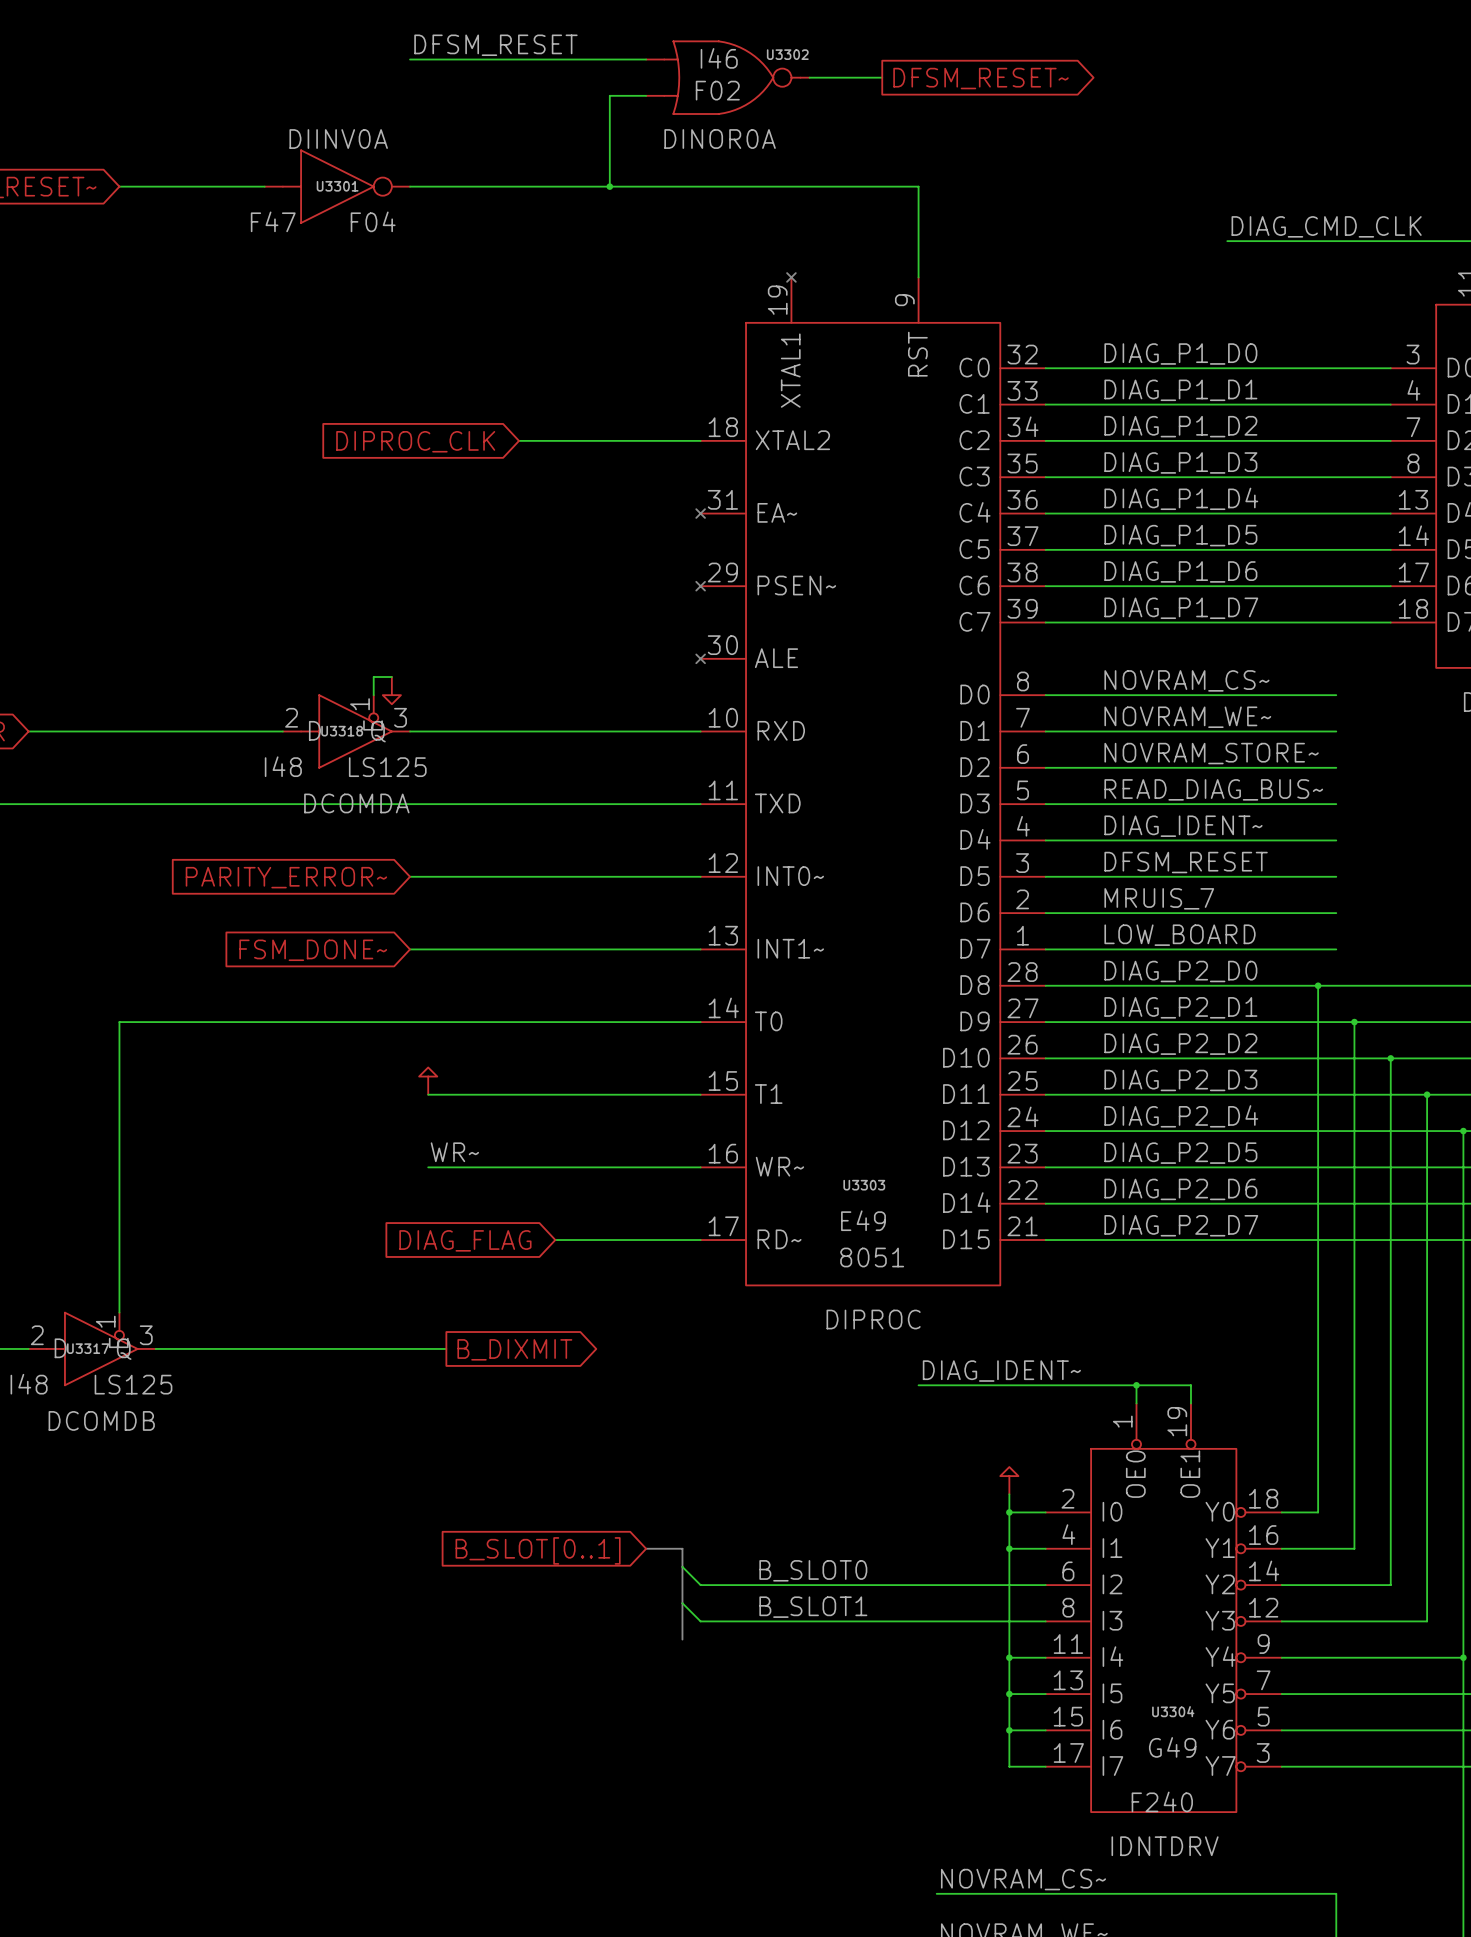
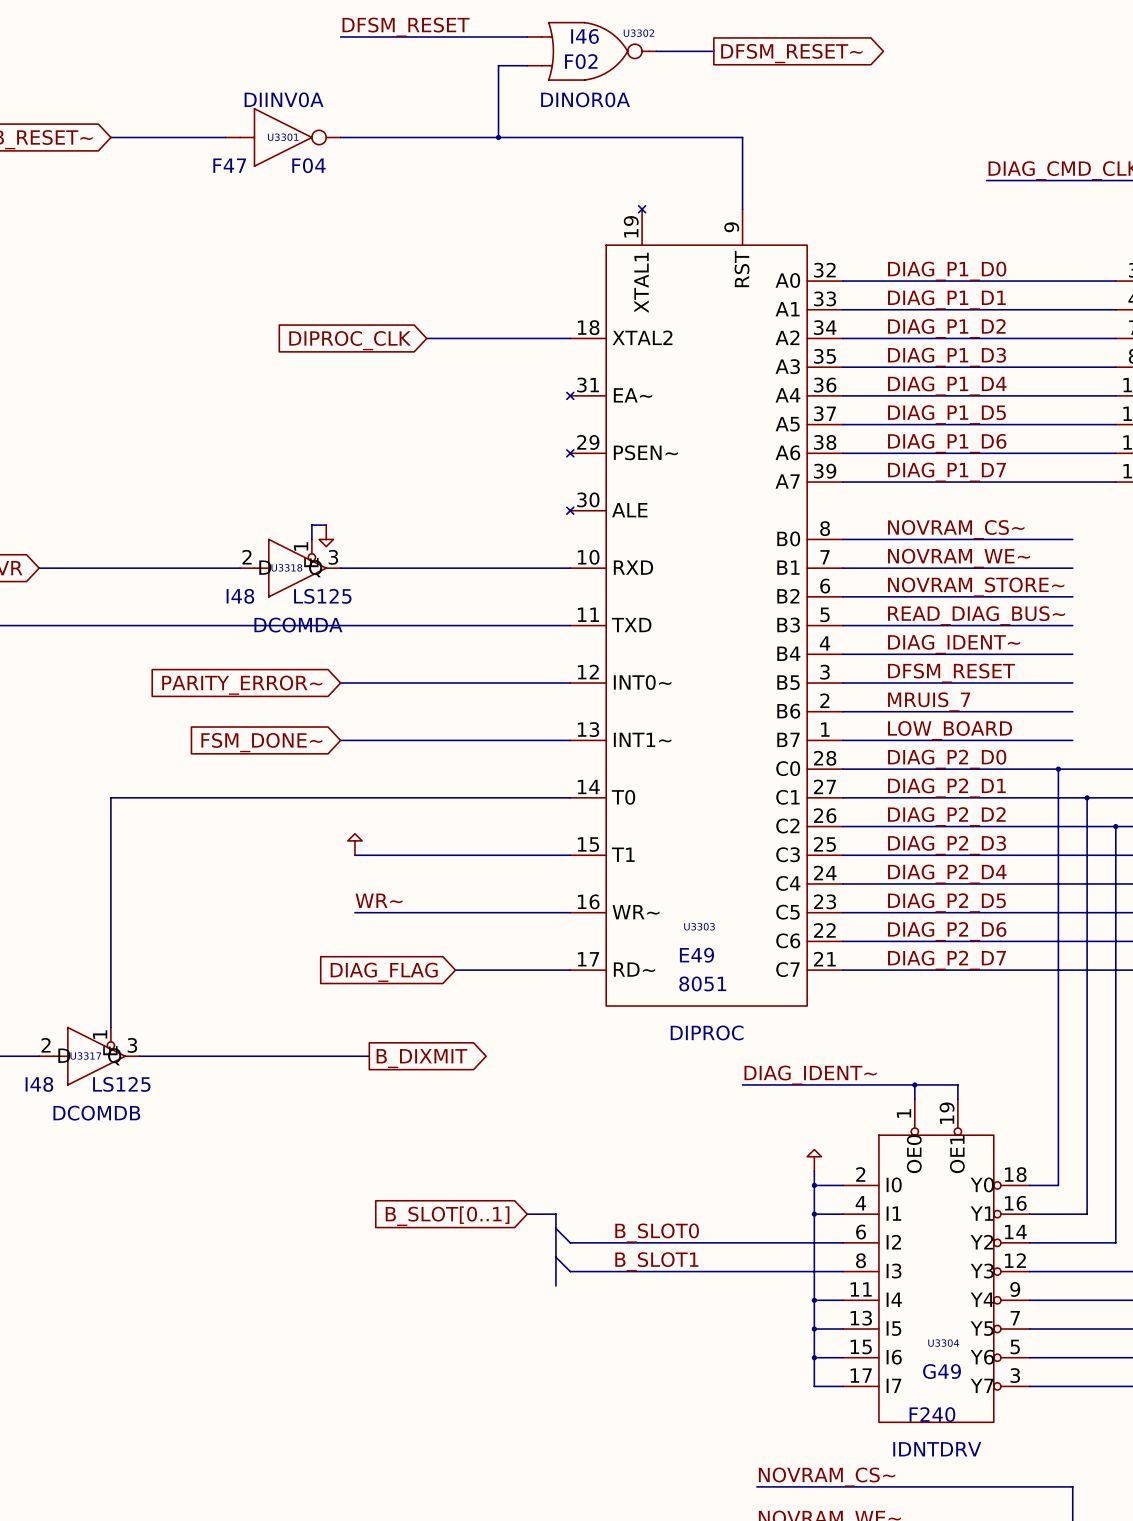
U3303 symbol: [700, 277, 1046, 1286] -> [570, 209, 844, 1007]

